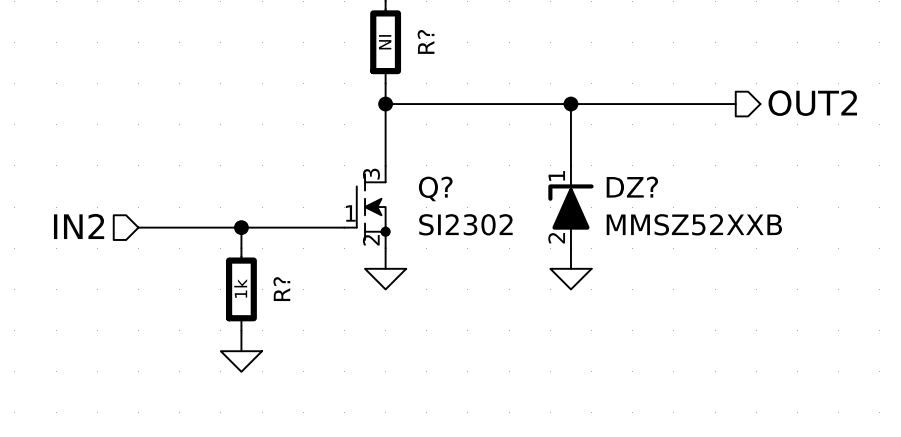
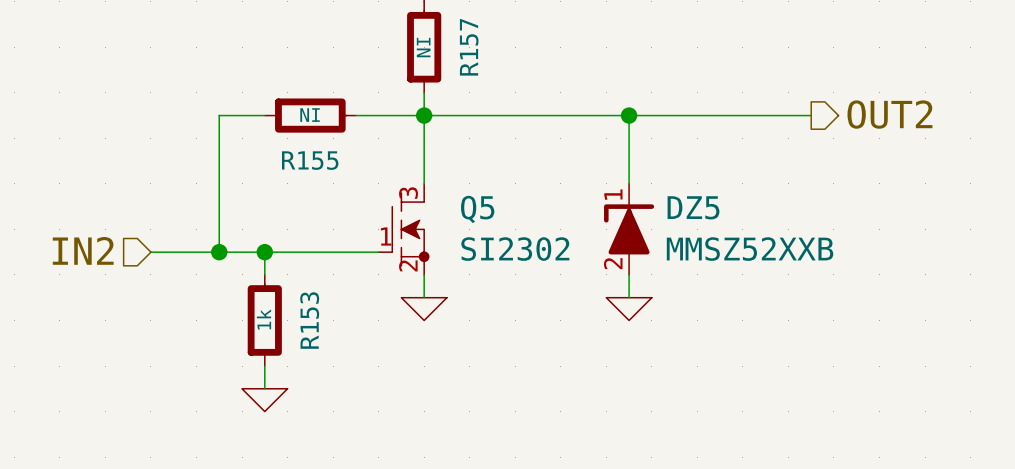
R? name: R? (426, 41) -> R157 (469, 47)
wire: none -> (264, 115) (219, 115) (219, 252)
R155: none -> NI (310, 115)
wire: none -> (355, 115) (424, 115)
DZ? name: DZ? (632, 187) -> DZ5 (693, 207)
Q? name: Q? (435, 188) -> Q5 (477, 209)
junction: none -> (219, 252)
R? name: R? (281, 289) -> R153 (309, 320)

